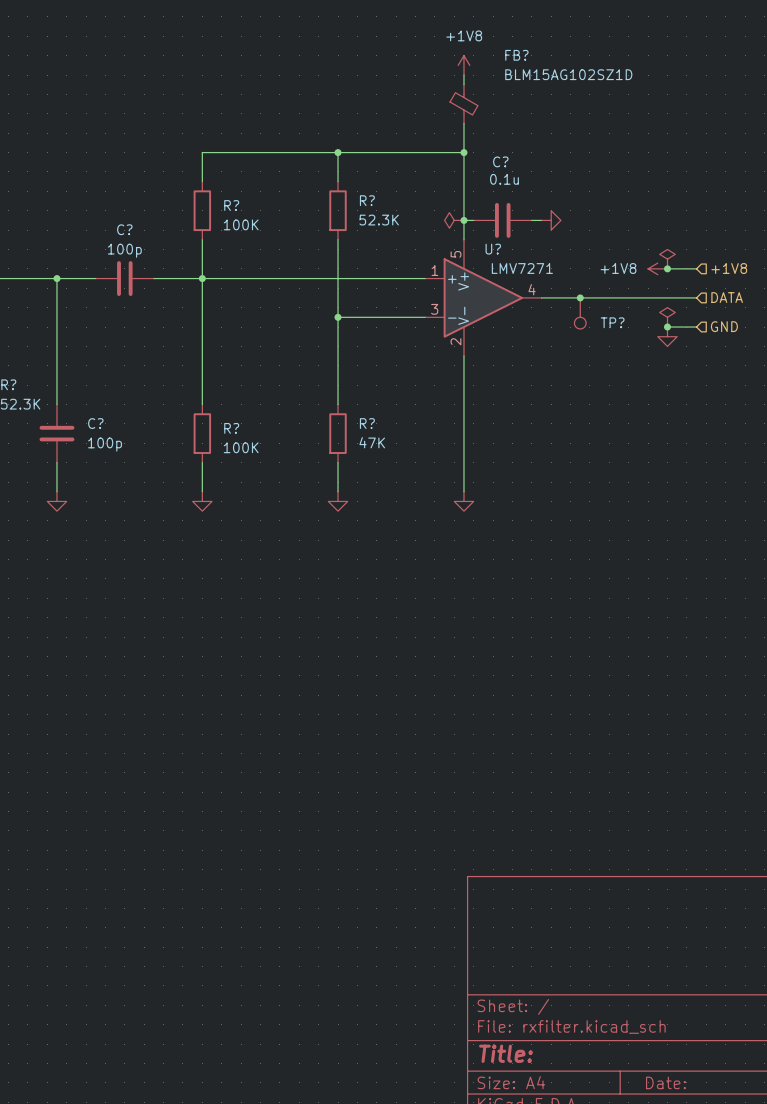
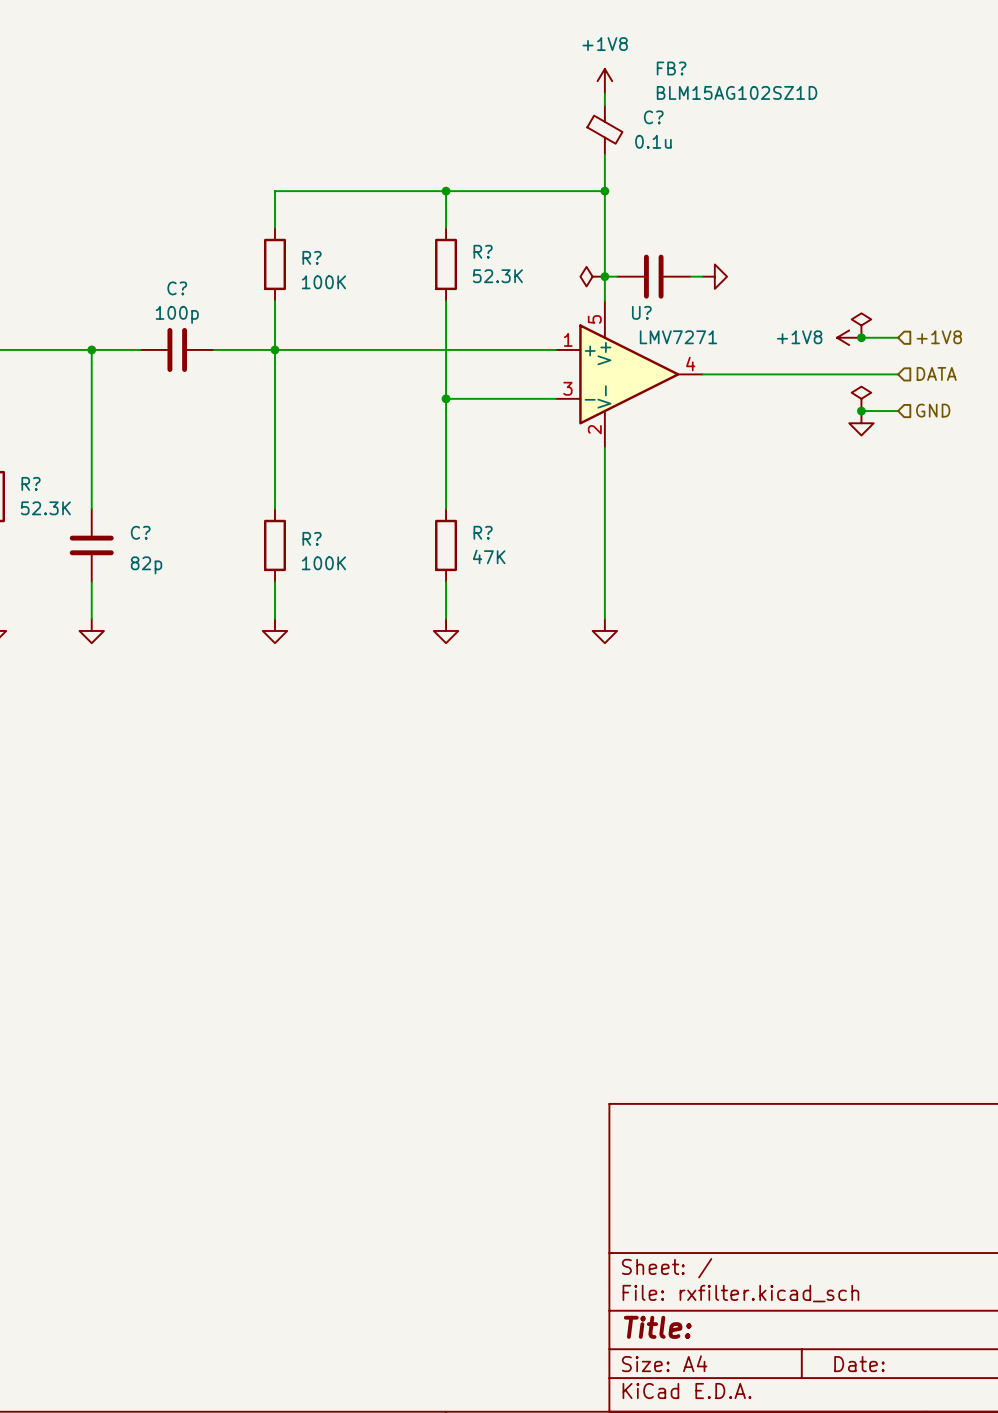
C? name position: C? (500, 161) -> C? (653, 117)
C? value position: 0.1u (504, 179) -> 0.1u (653, 141)
junction: (580, 297) -> none
TP?: (580, 313) -> none
C? value: 100p (105, 444) -> 82p (146, 565)

